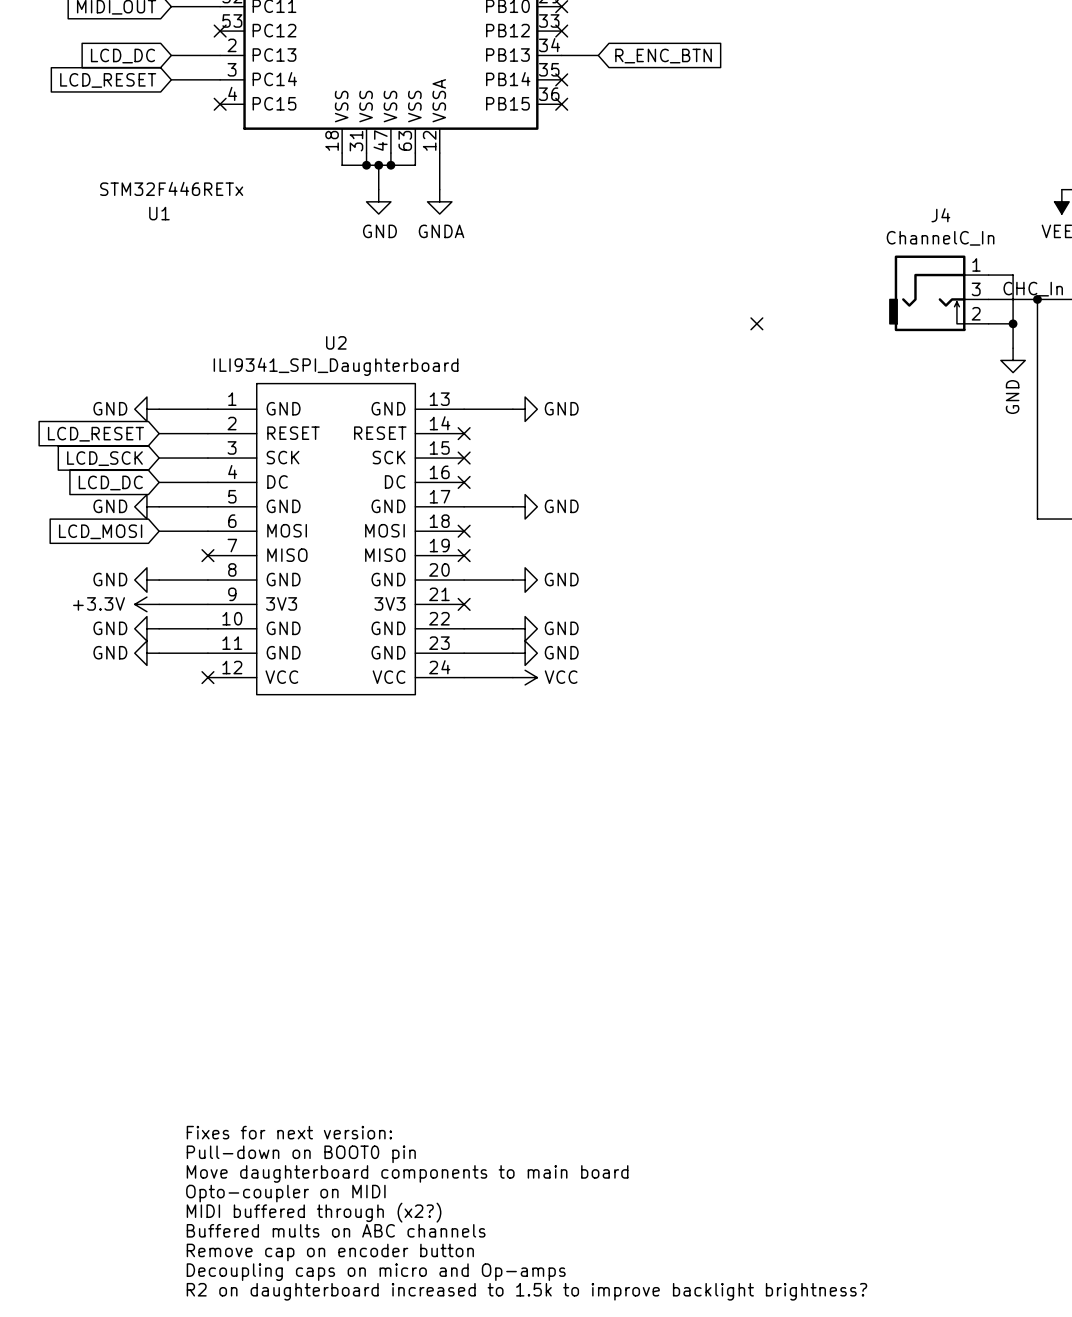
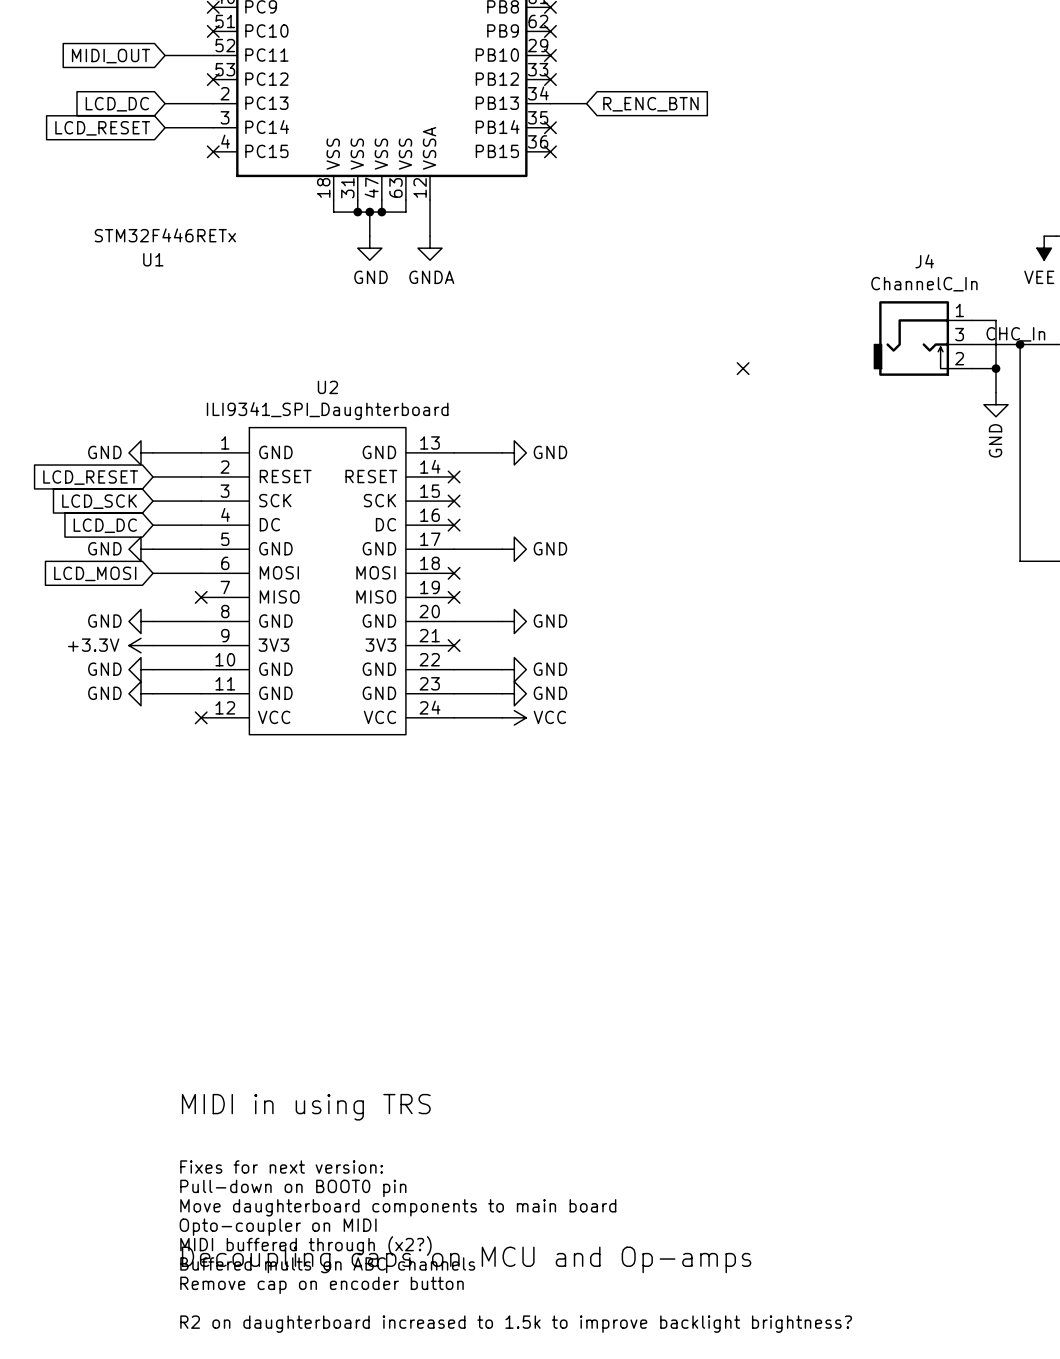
text: none -> MIDI in using TRS (306, 1107)
text: none -> Decoupling caps on MCU and Op-amps (466, 1259)
text: Decoupling caps on micro and Op-amps (376, 1272) -> none

